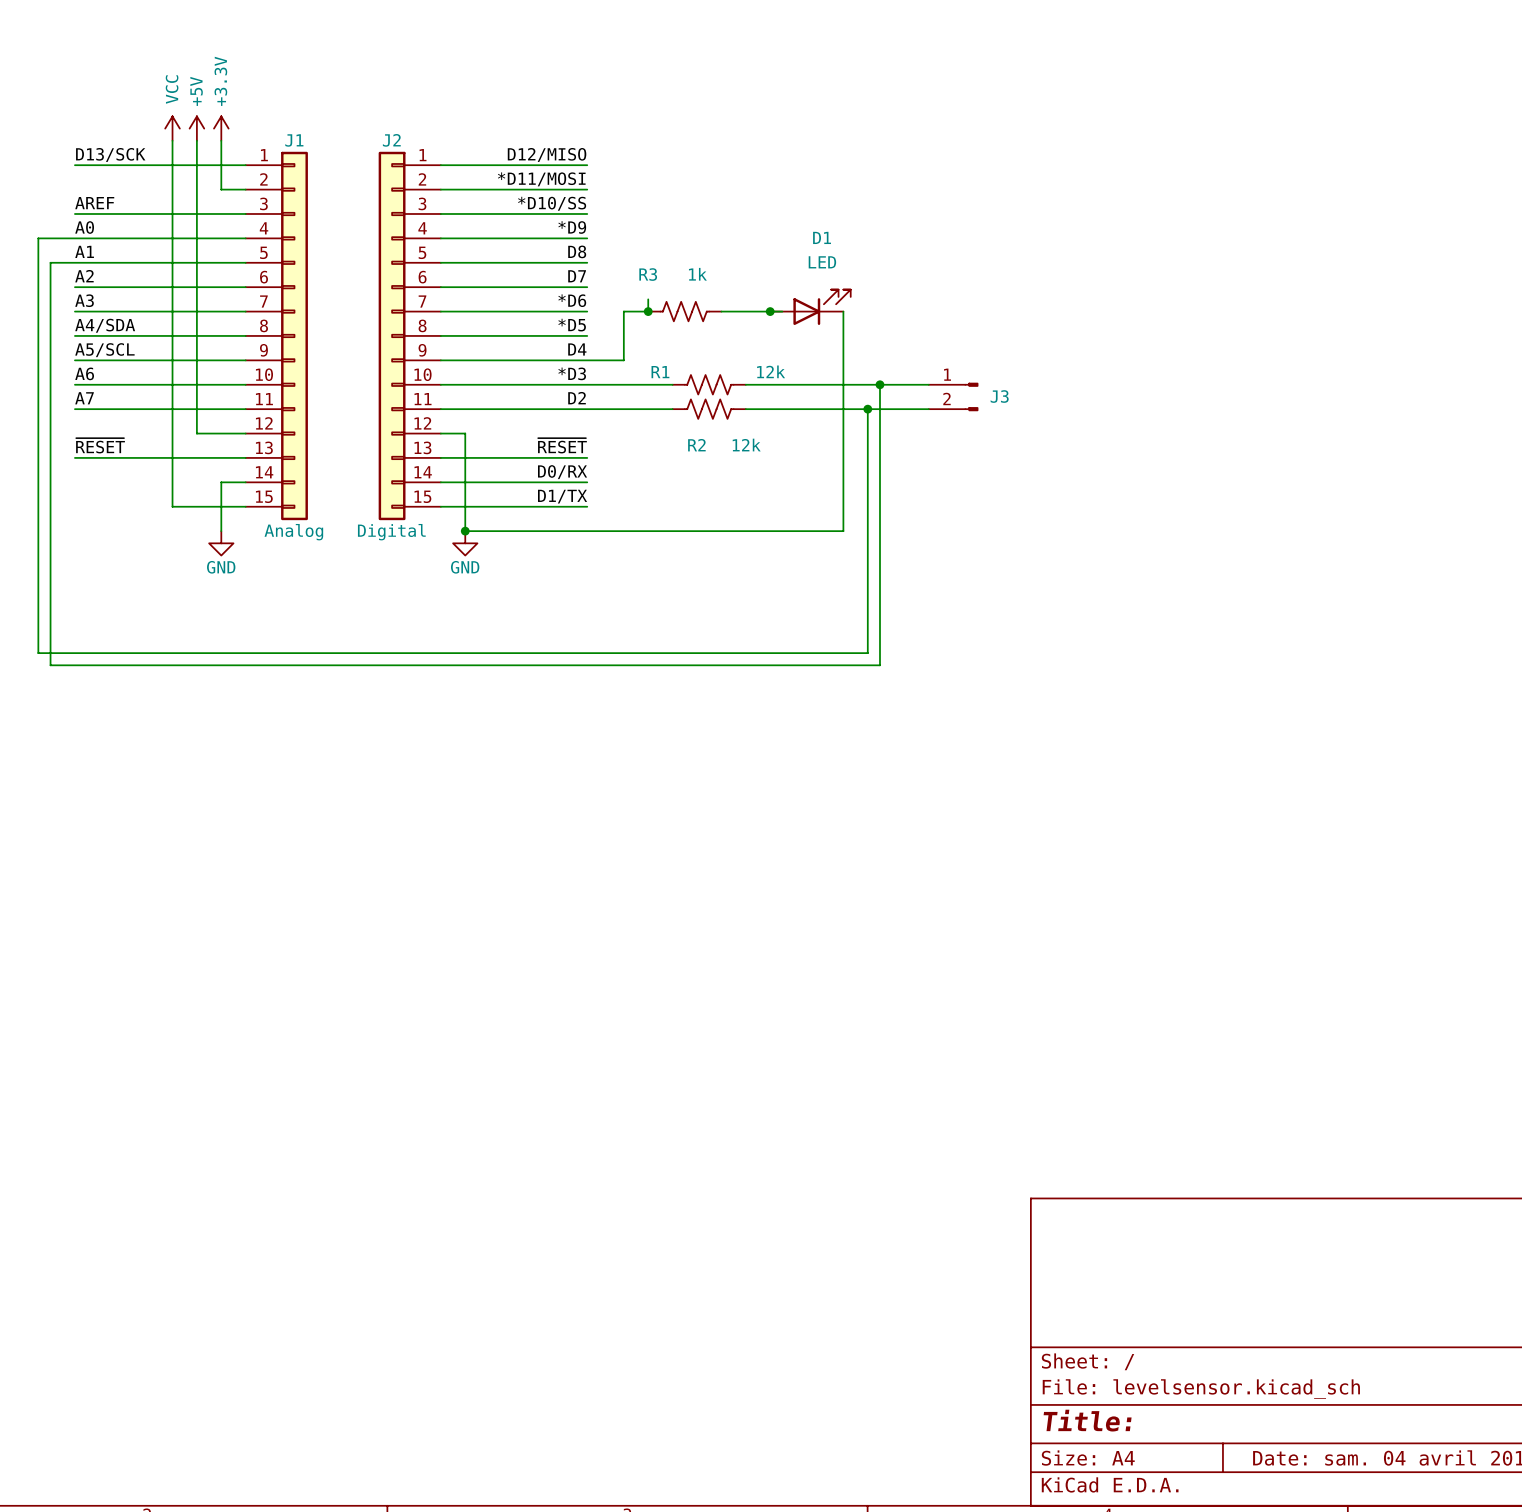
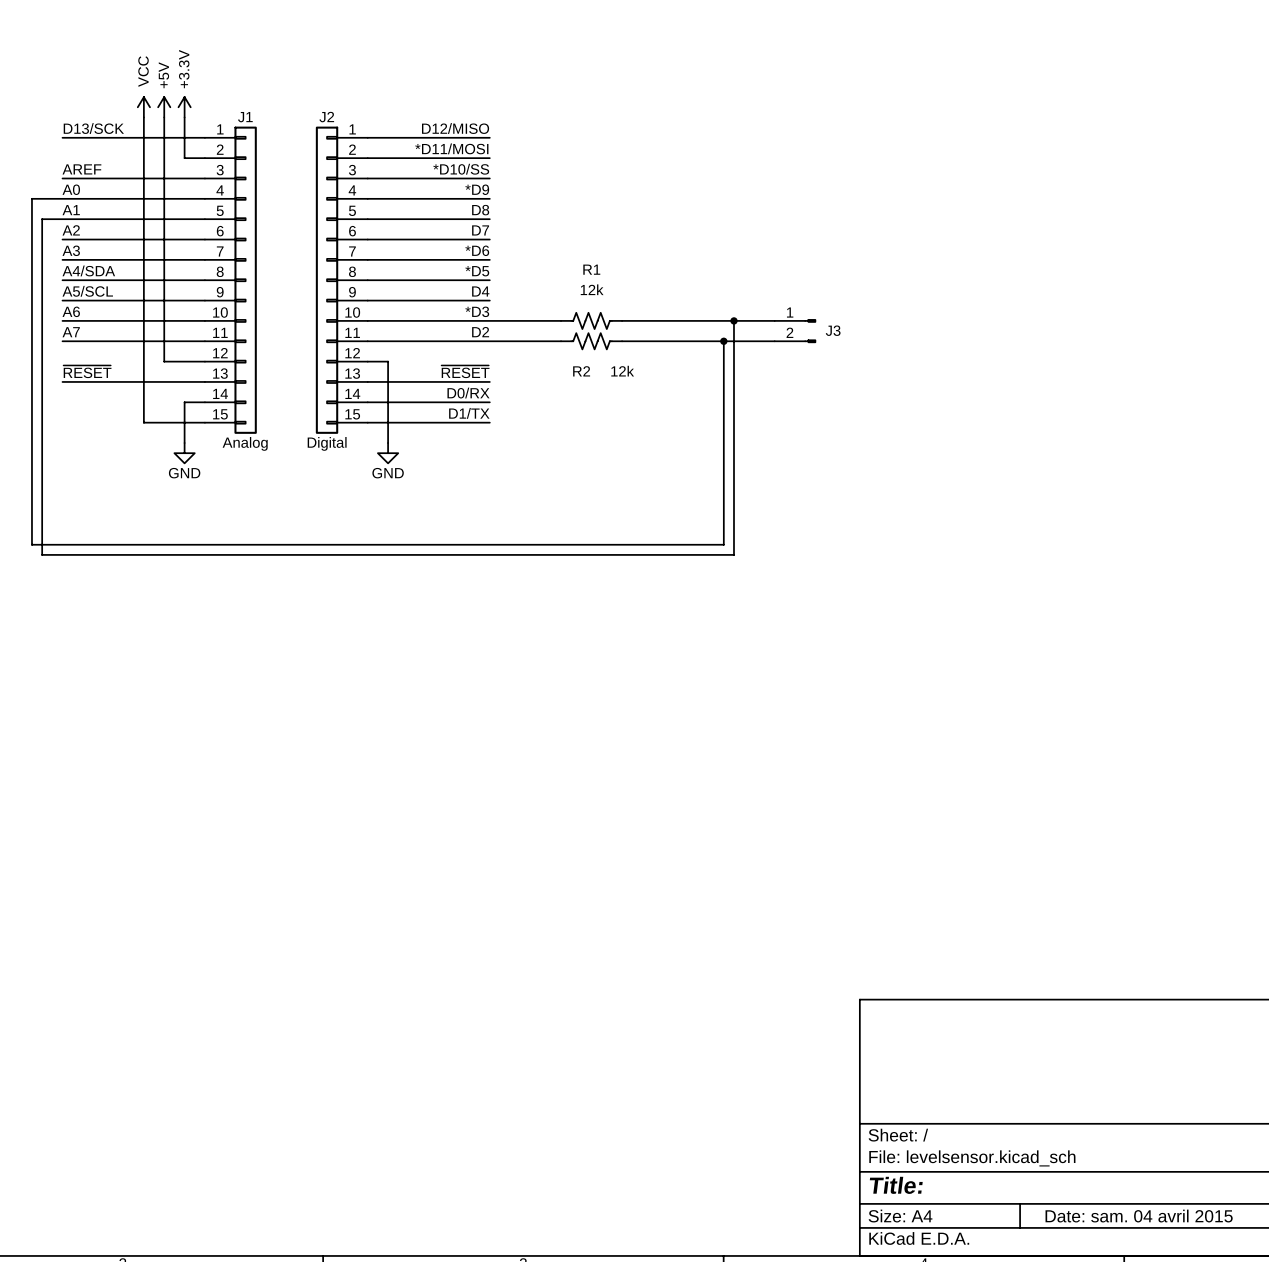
wire: (648, 299) (648, 311) (623, 311) (623, 360) (587, 360) -> none
D1: LED (810, 307) -> none
junction: (648, 311) -> none
R3: 1k (684, 311) -> none
wire: (721, 311) (782, 311) -> none
junction: (770, 311) -> none
wire: (843, 311) (843, 531) (465, 531) -> none
R1 value position: 12k (771, 371) -> 12k (592, 289)
R1 name position: R1 (660, 372) -> R1 (591, 269)
junction: (465, 531) -> none

